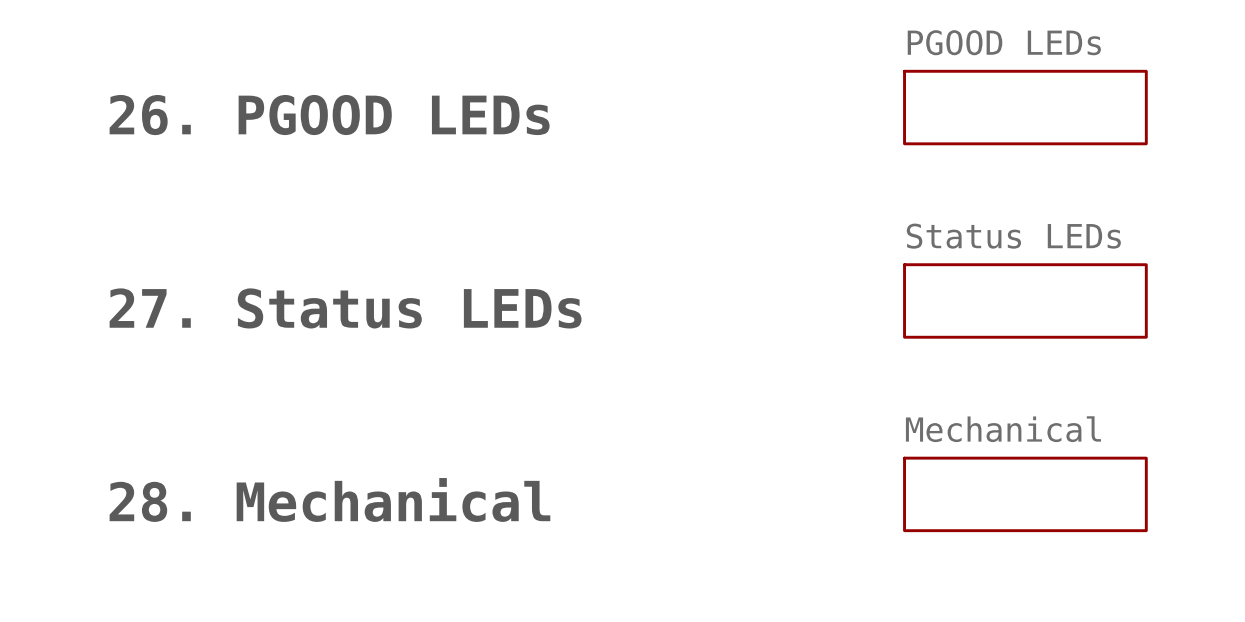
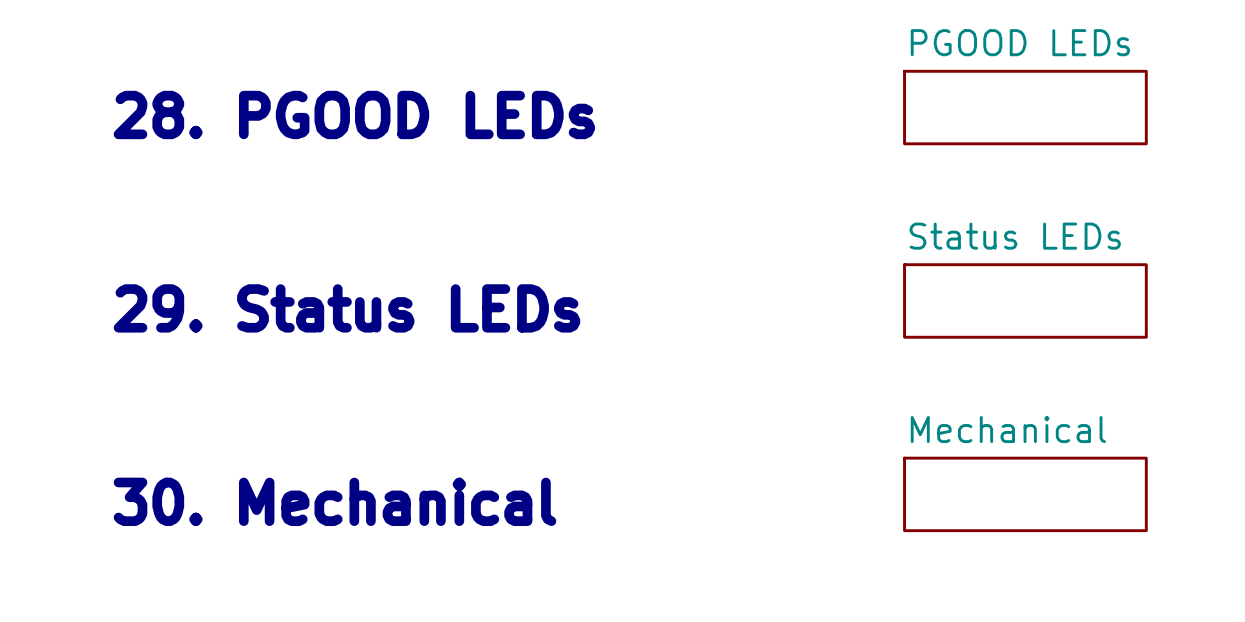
text: 26. PGOOD LEDs (329, 115) -> 28. PGOOD LEDs (354, 114)
text: 27. Status LEDs (345, 308) -> 29. Status LEDs (346, 308)
text: 28. Mechanical (329, 499) -> 30. Mechanical (334, 501)

